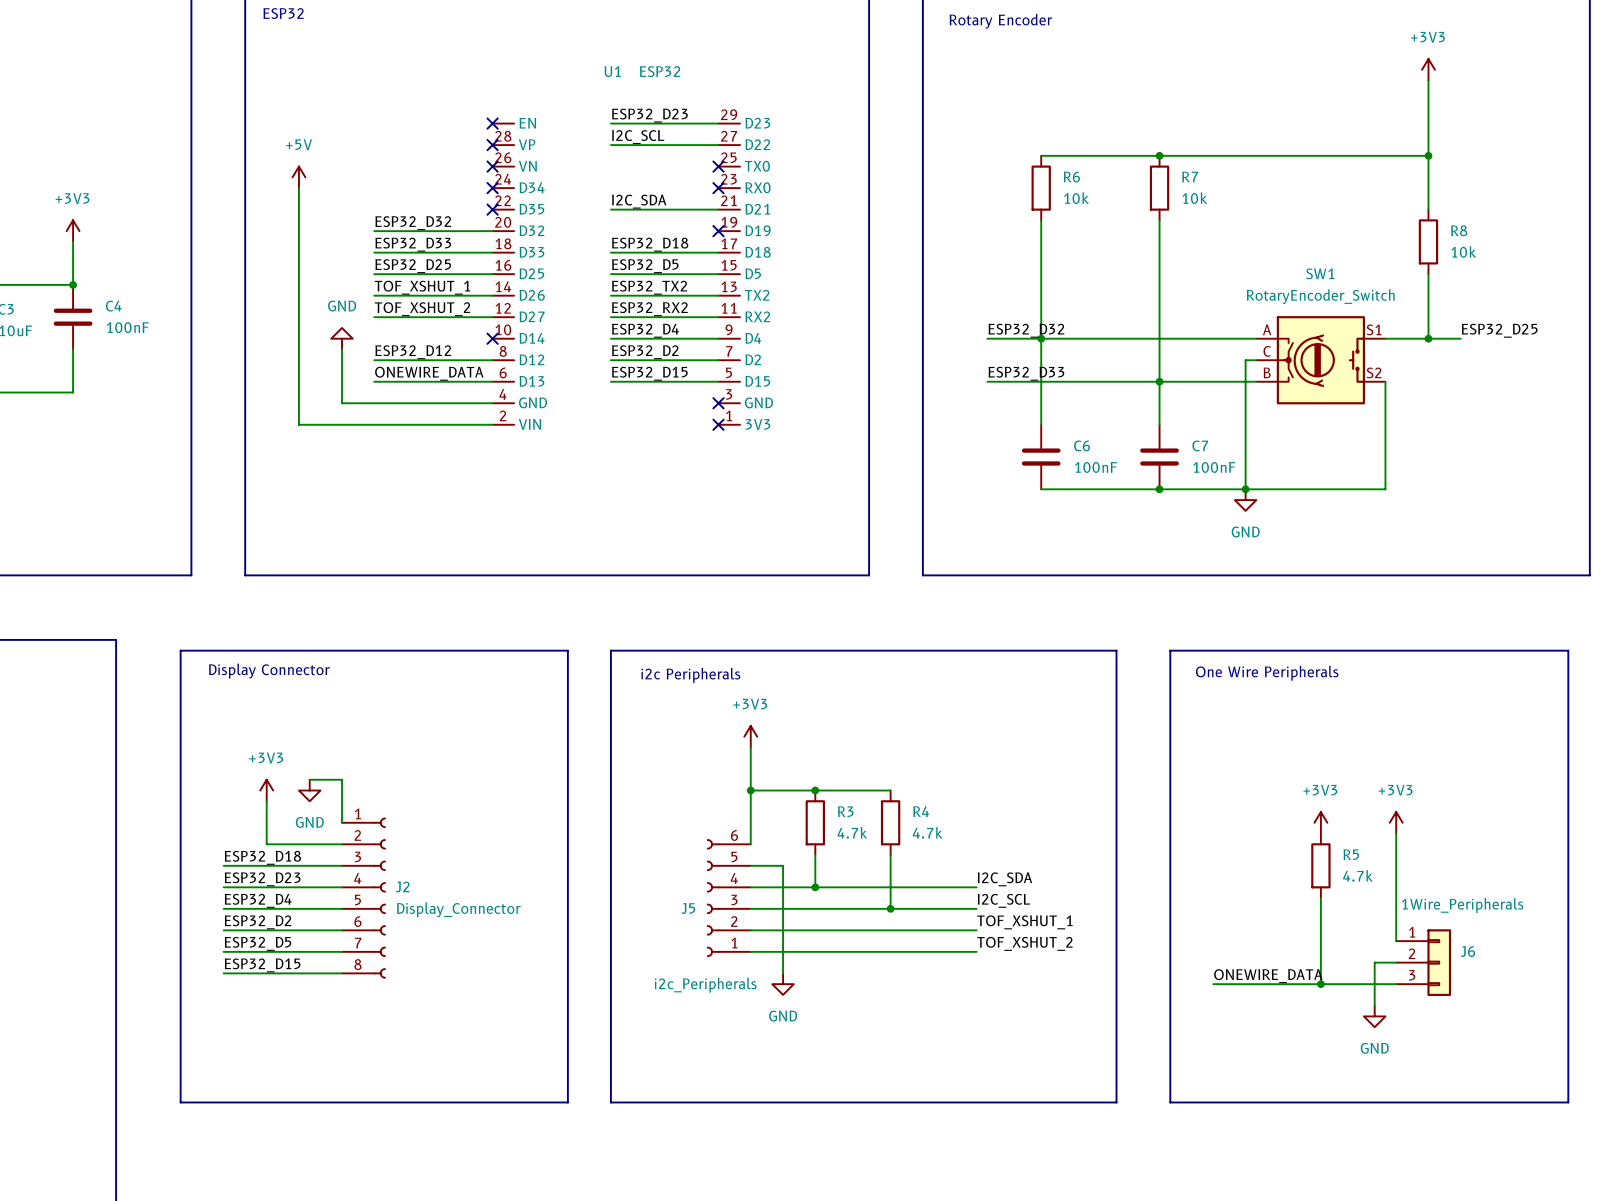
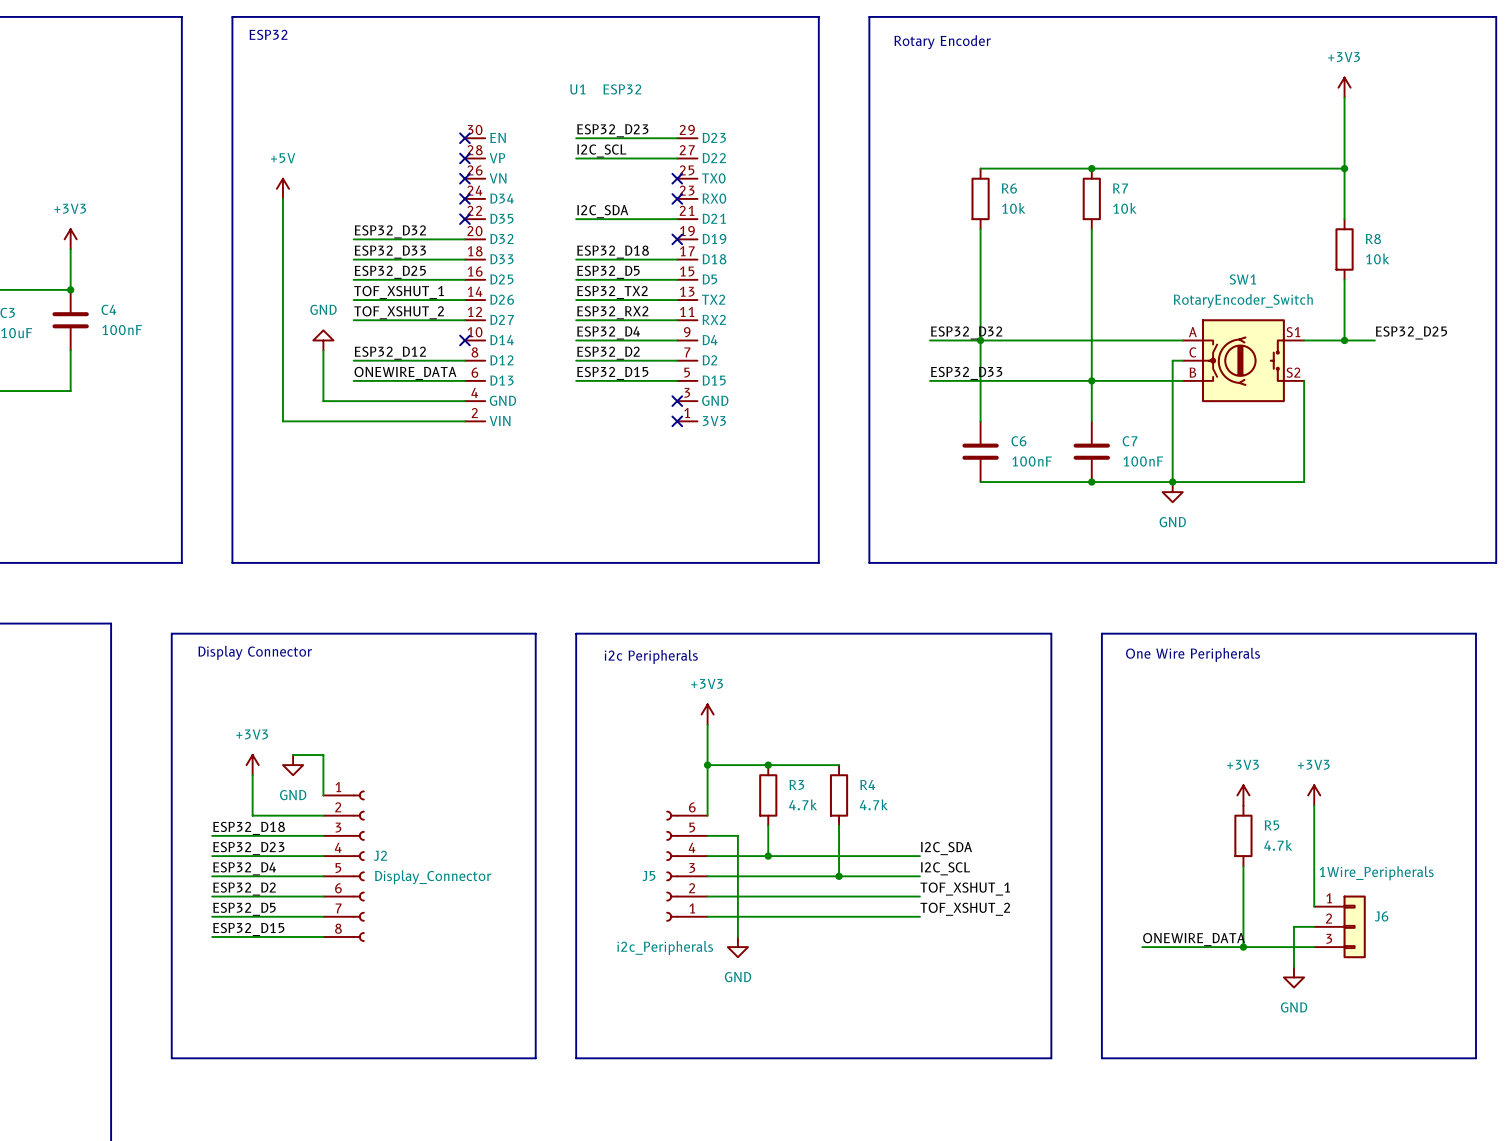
U1 pin number: none -> 30 (475, 130)

